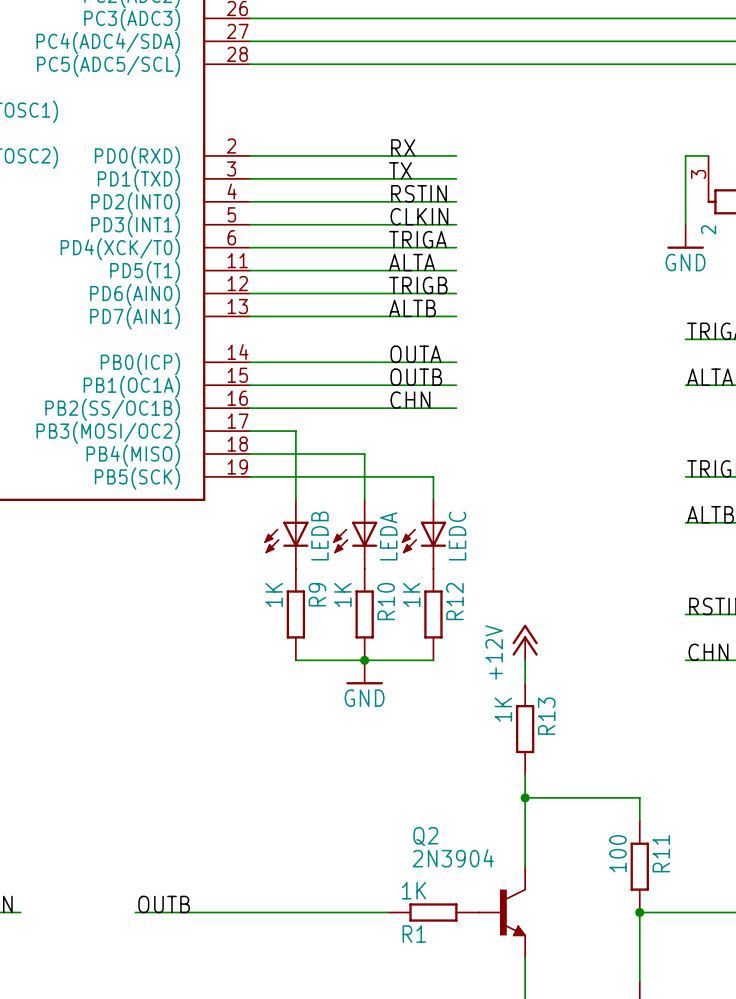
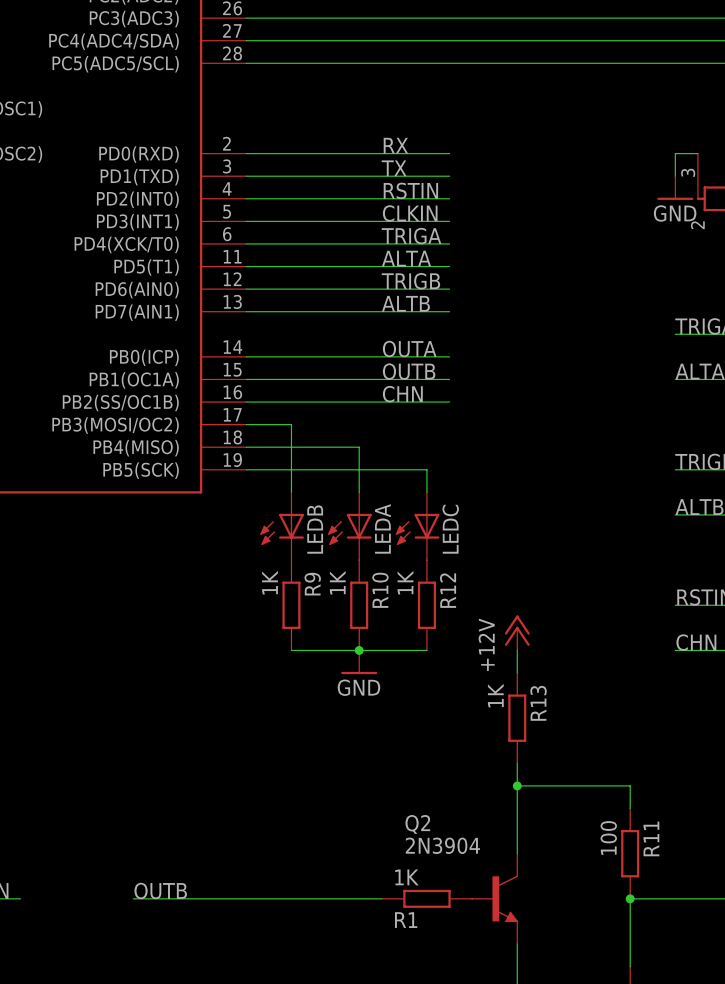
power symbol position: GND (685, 236) -> GND (675, 188)

